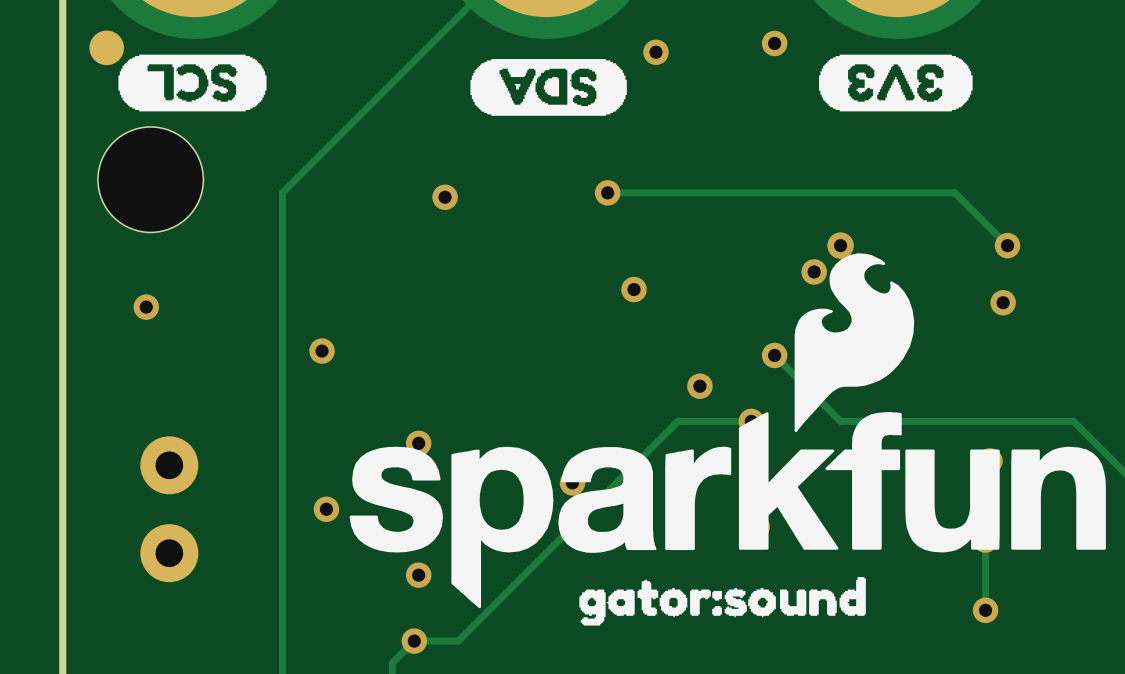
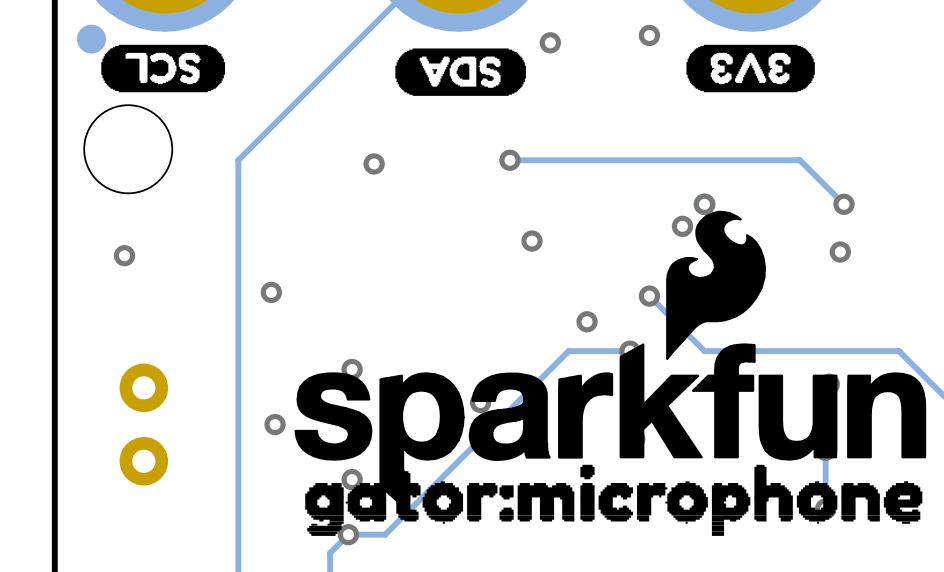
drawing shape: [579, 577, 866, 626] -> [305, 464, 923, 536]

